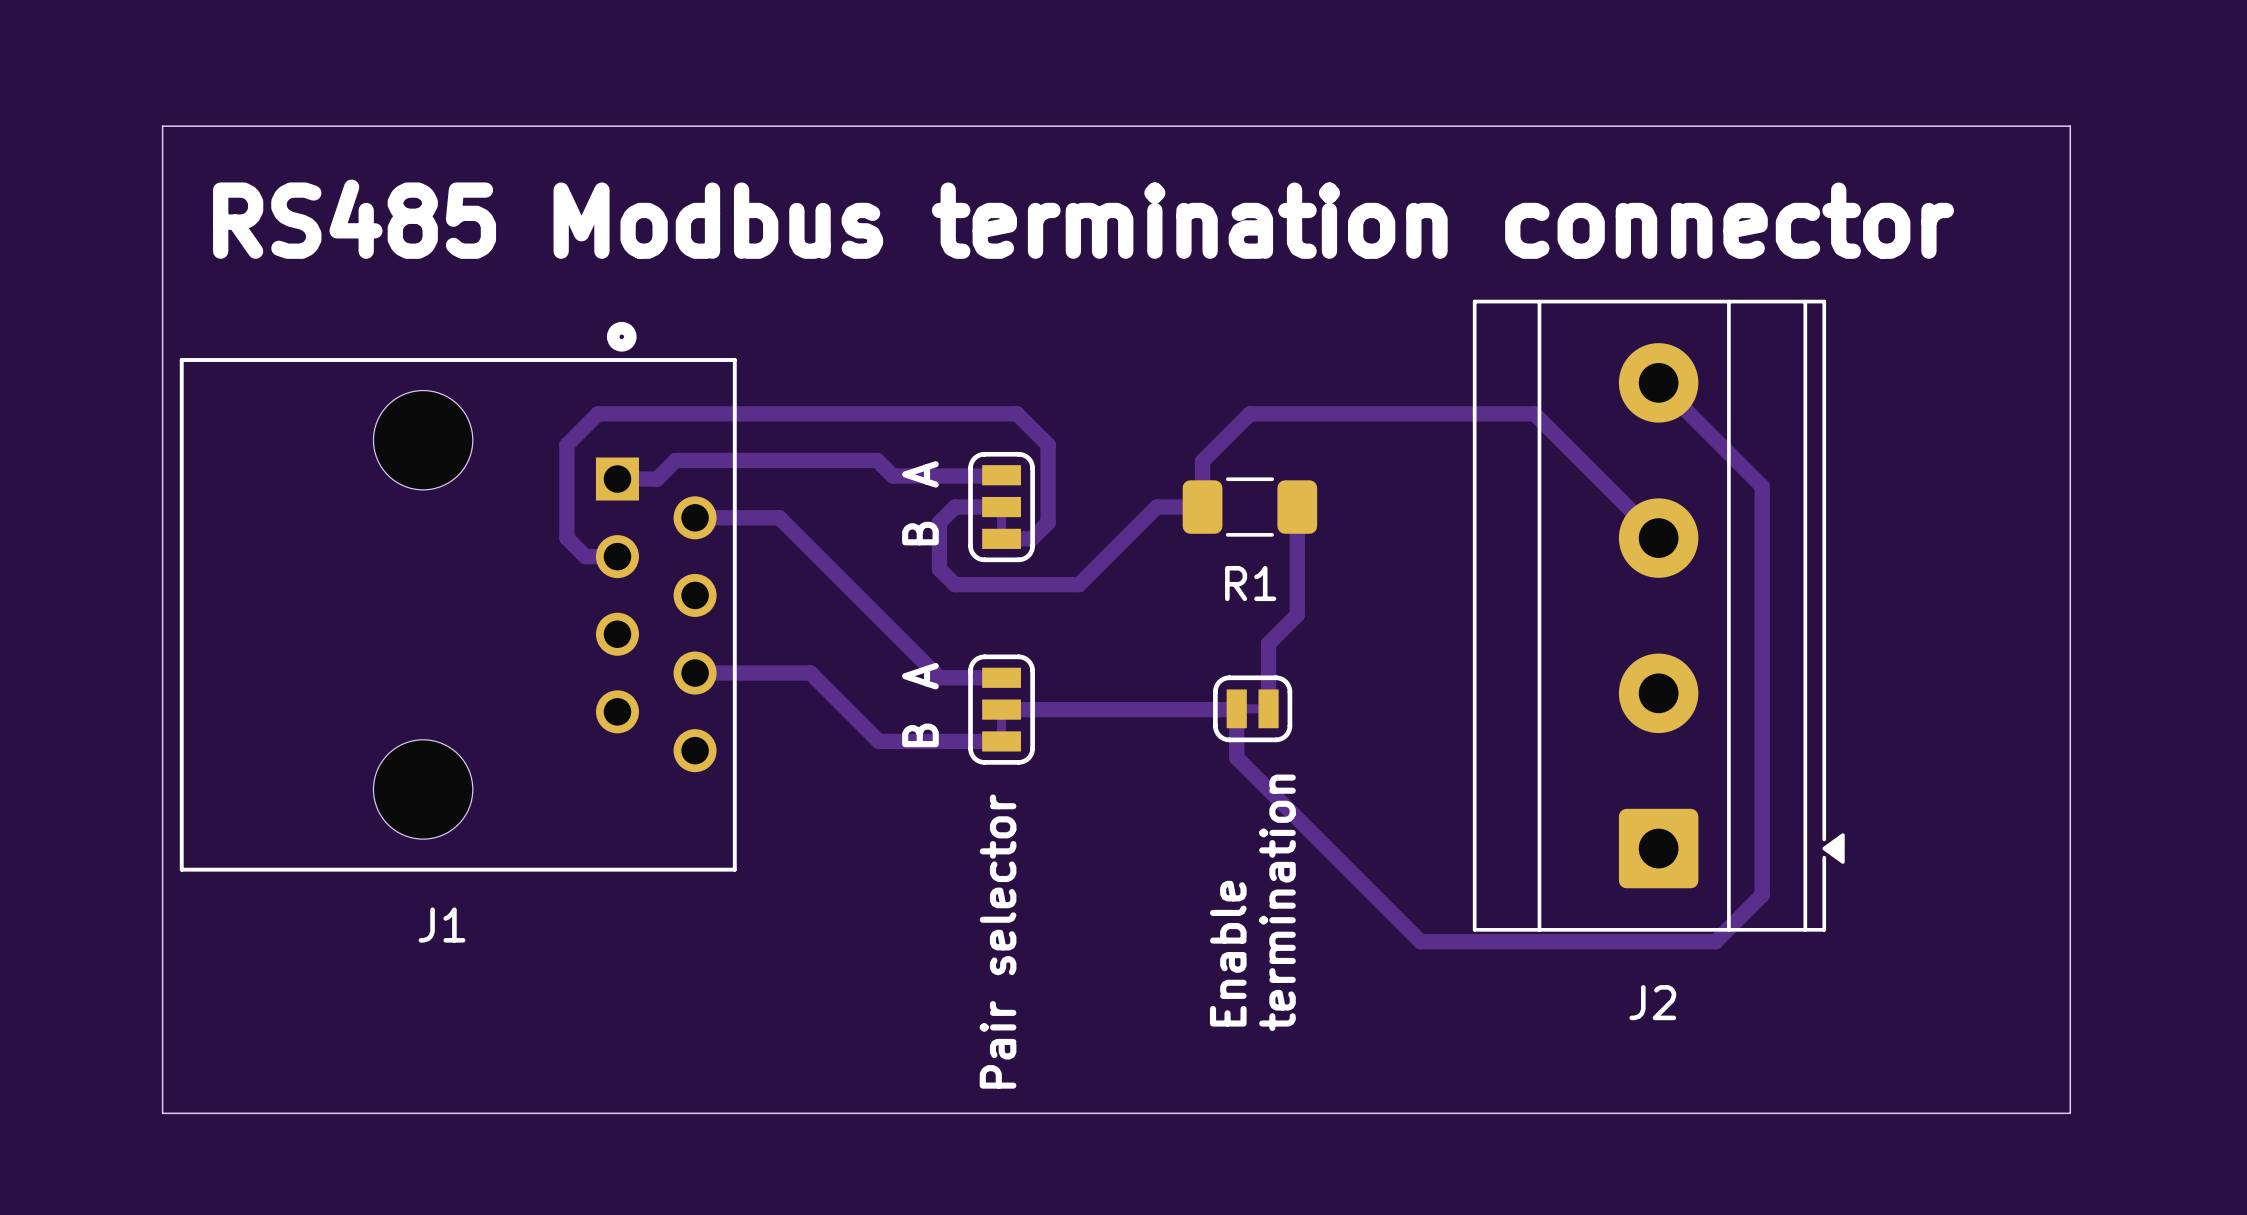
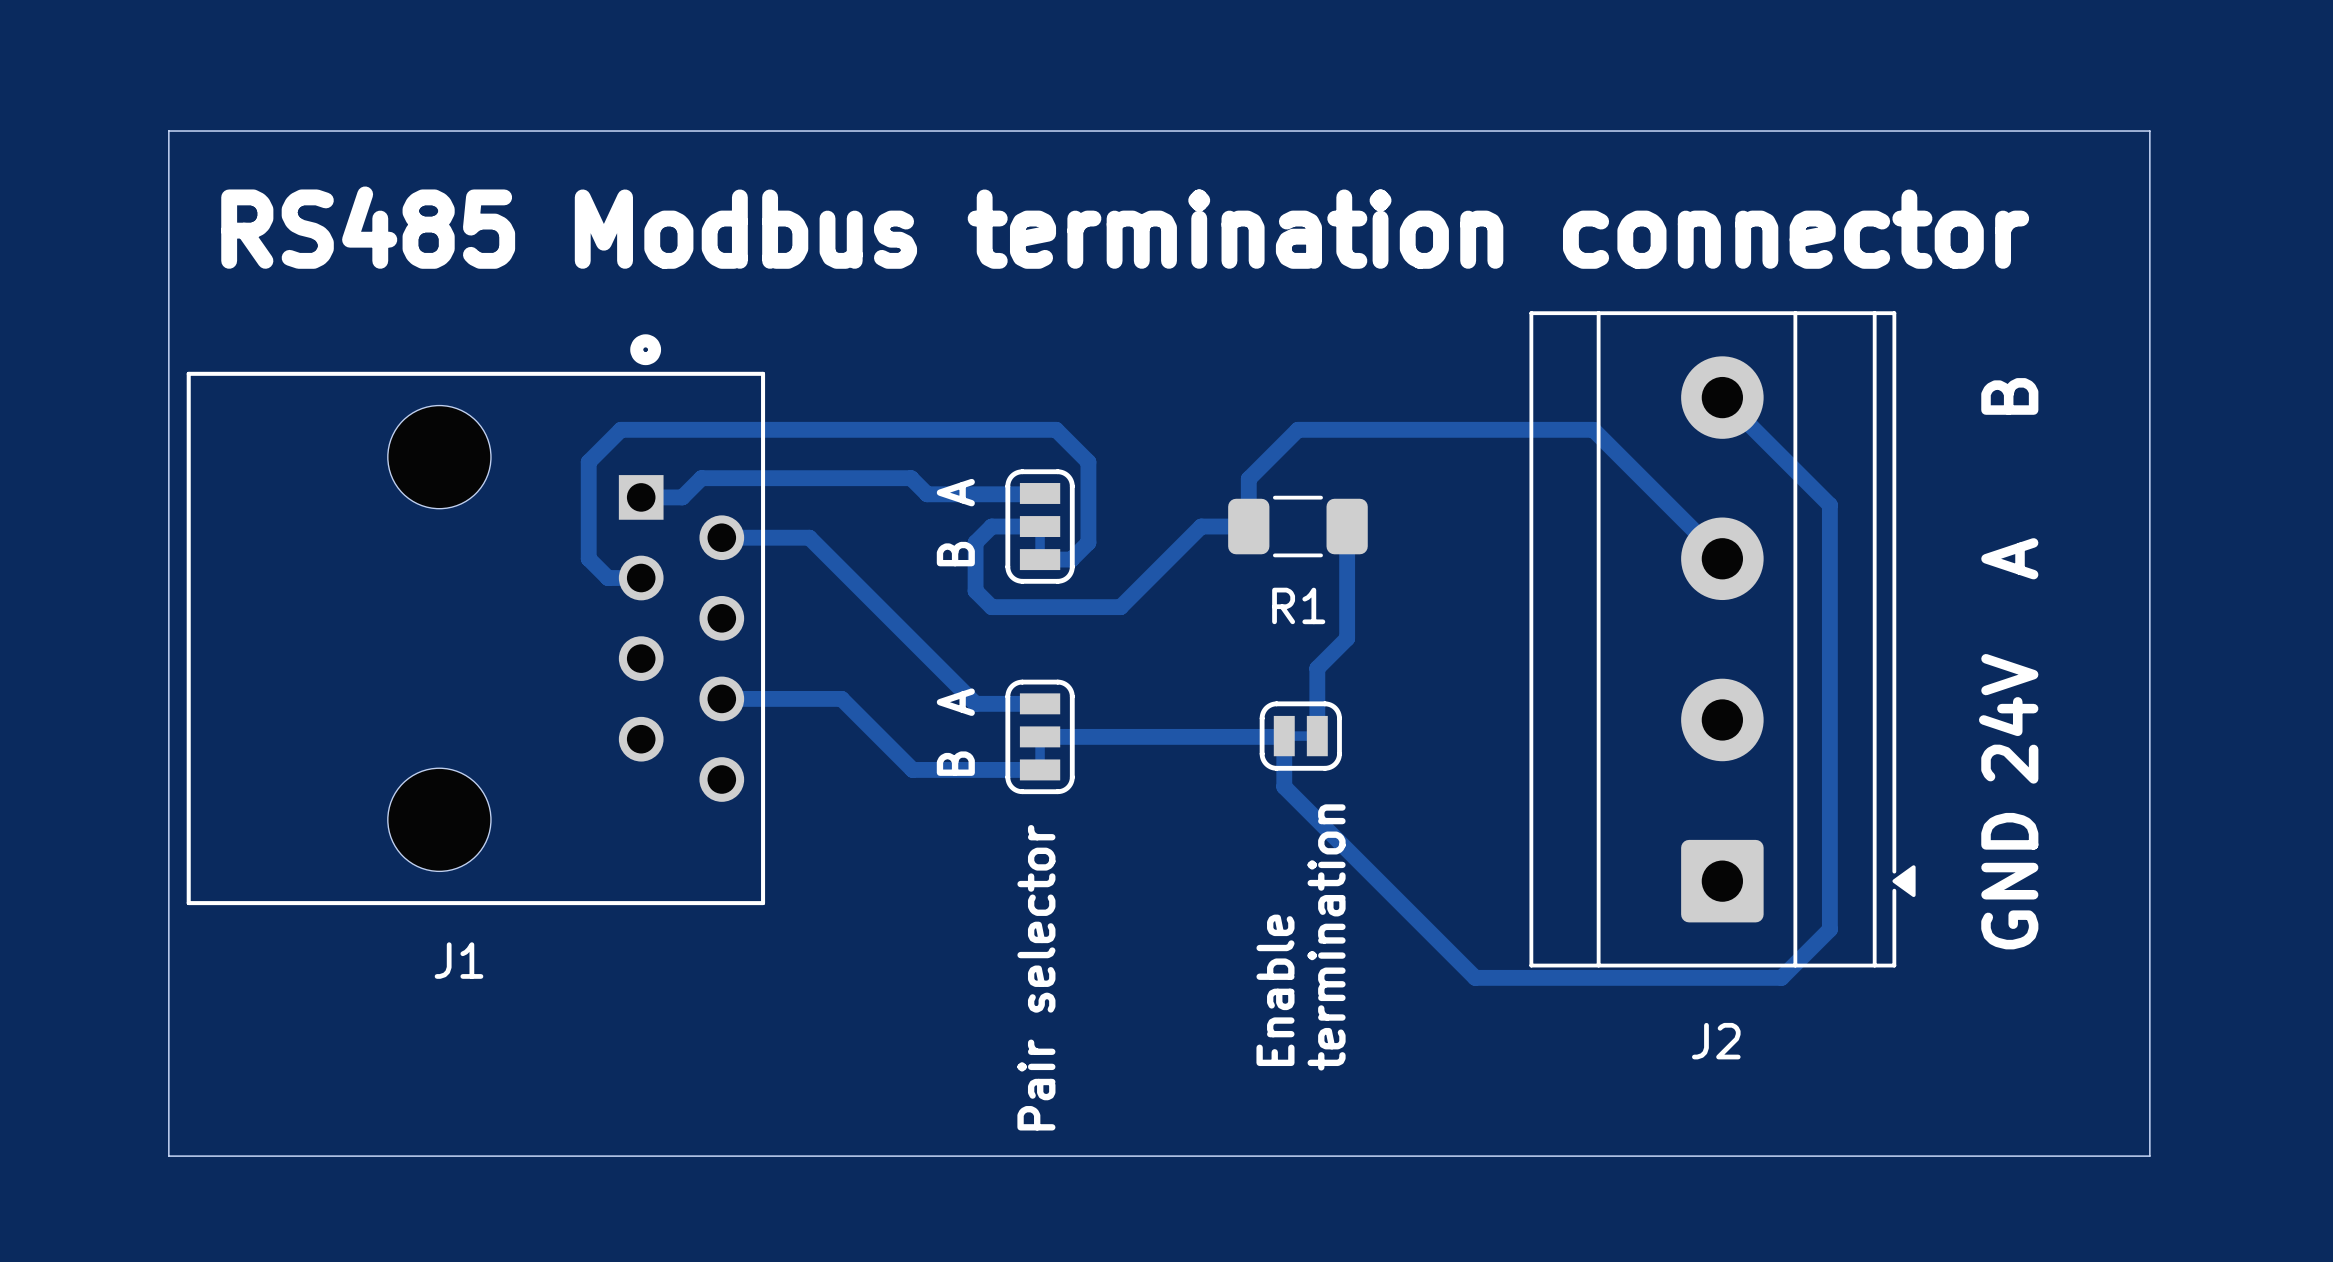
text: none -> B (2009, 396)
text: none -> A (2009, 558)
text: none -> 24V (2008, 718)
text: none -> GND (2009, 881)

